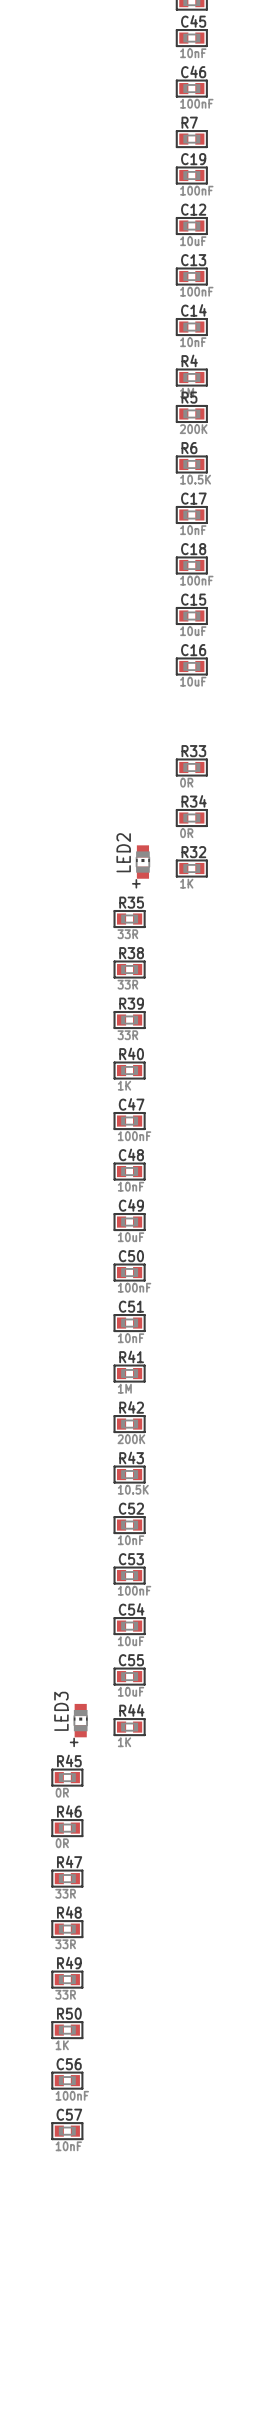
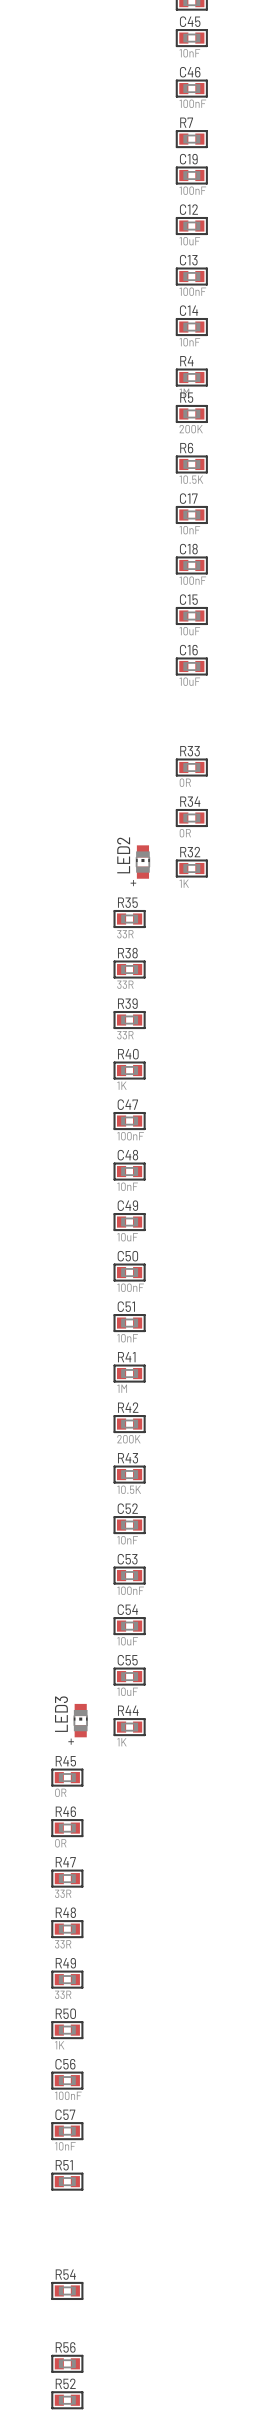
R51: none -> (67, 2181)
R54: none -> (67, 2290)
R56: none -> (67, 2363)
R52: none -> (67, 2400)

